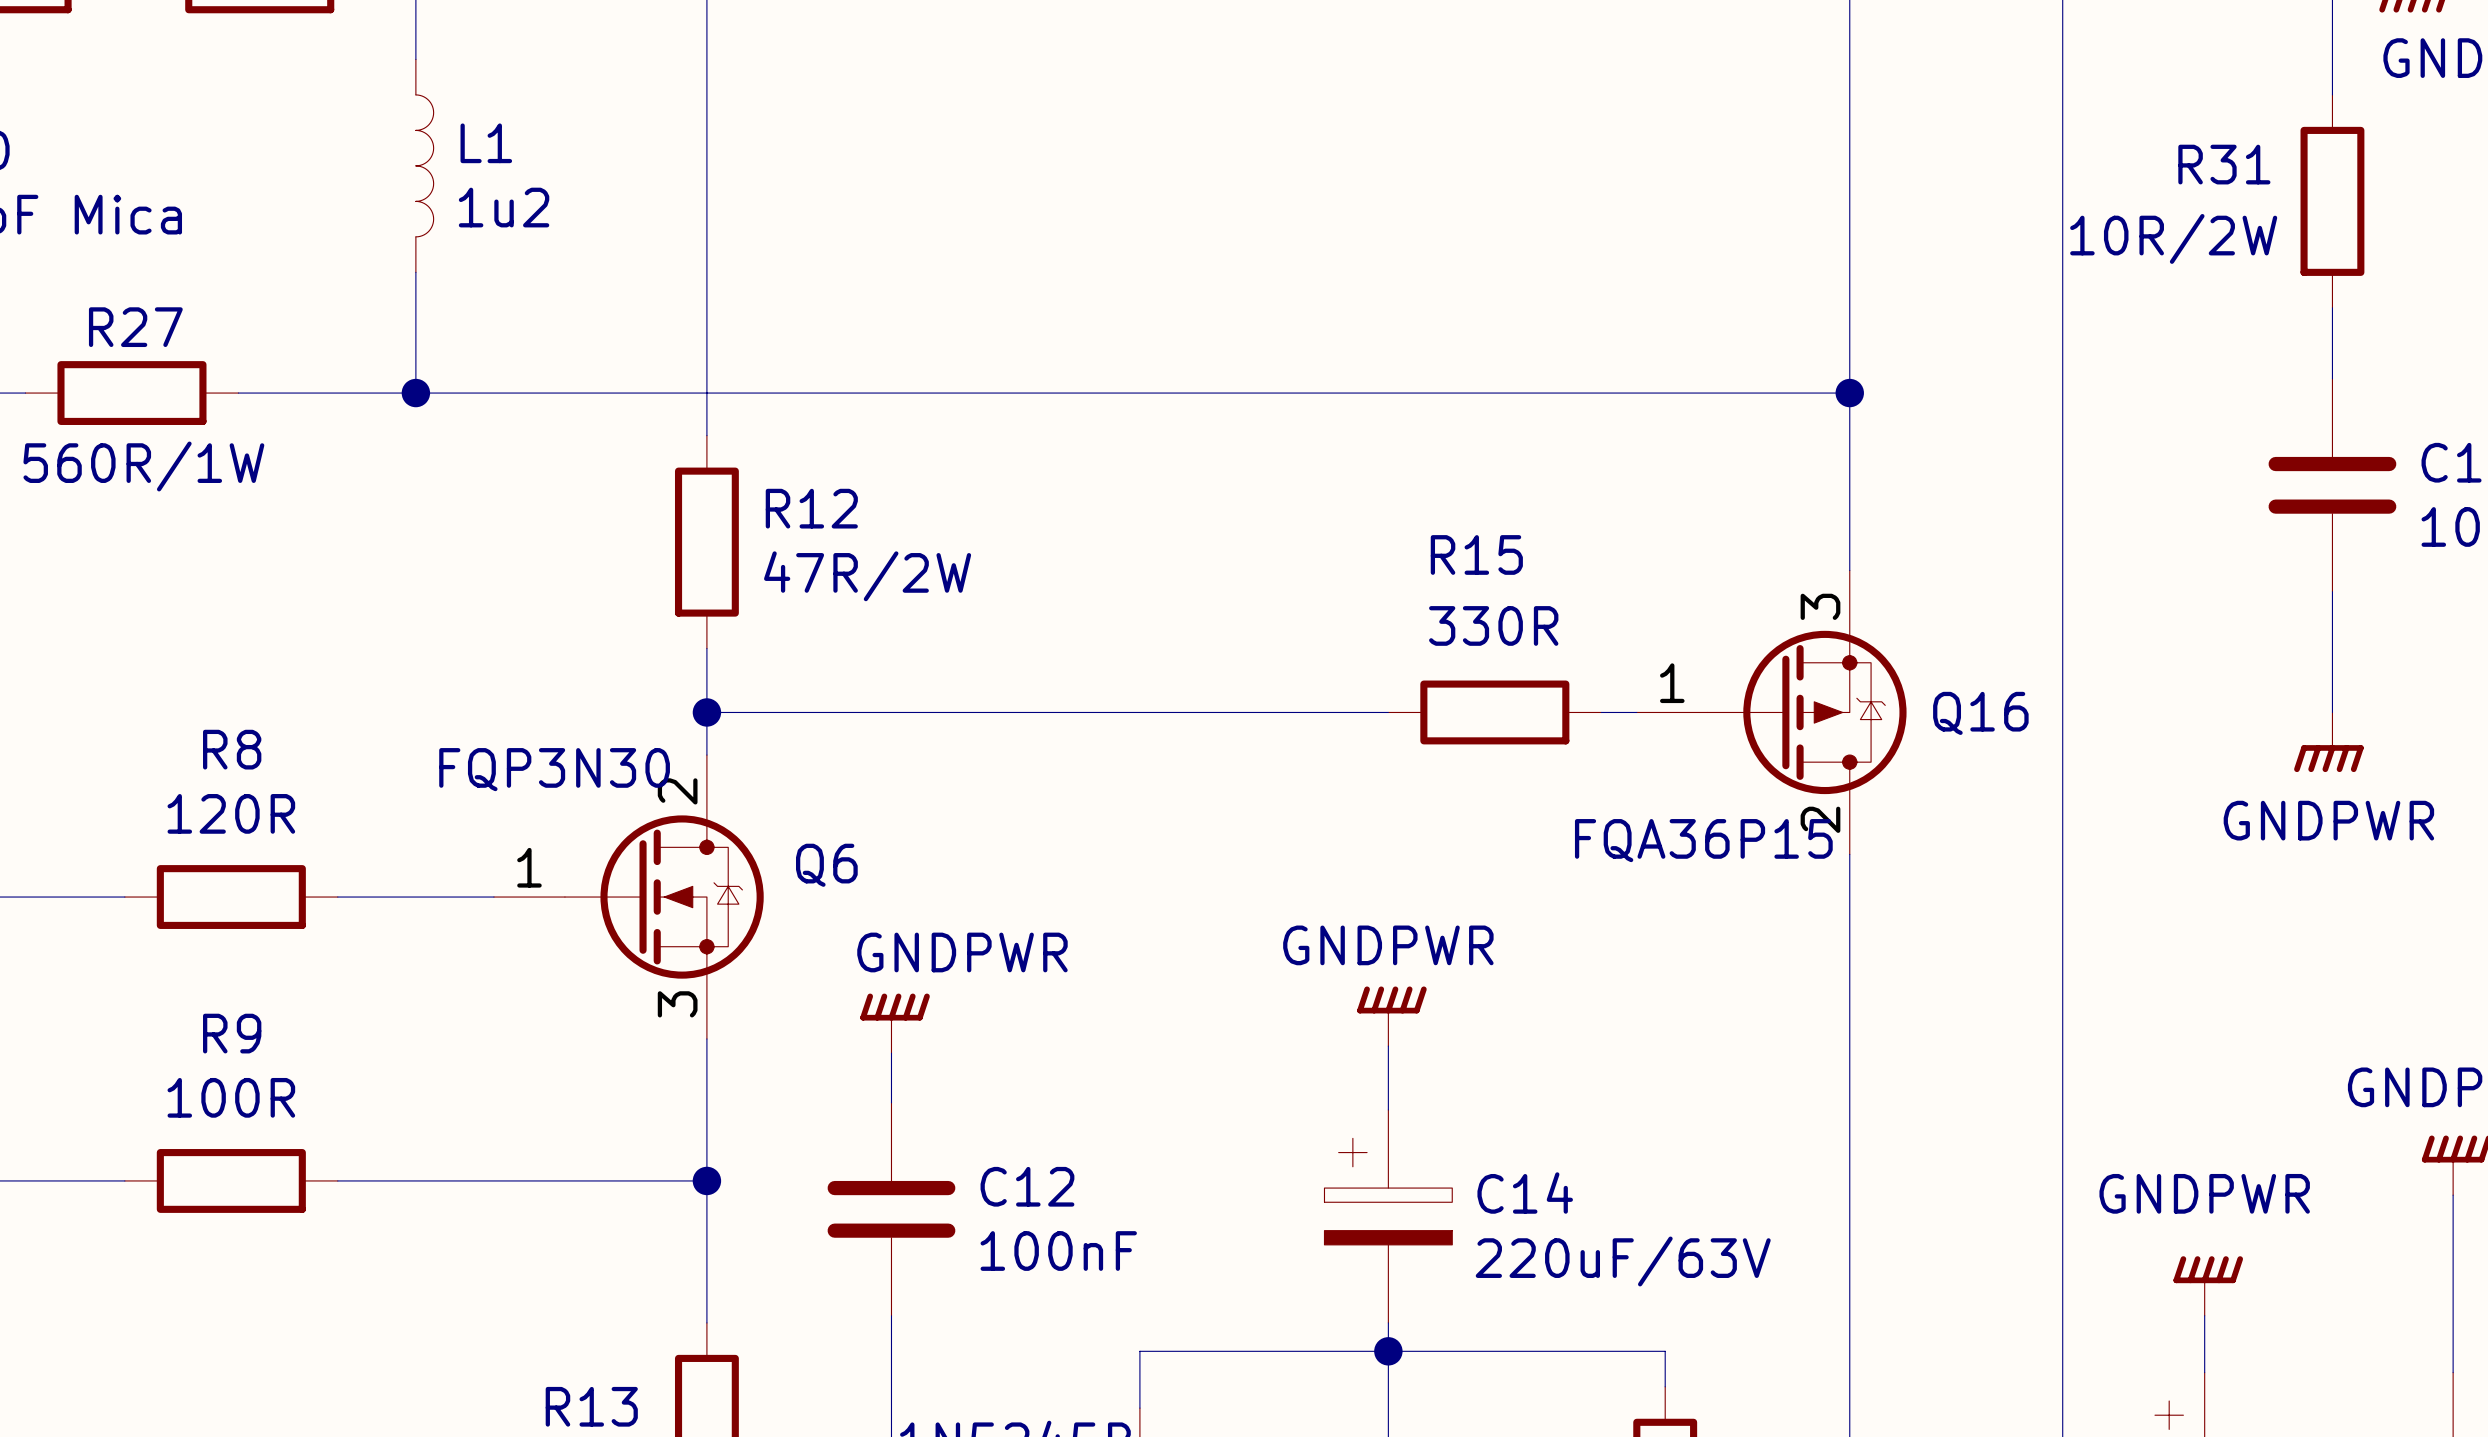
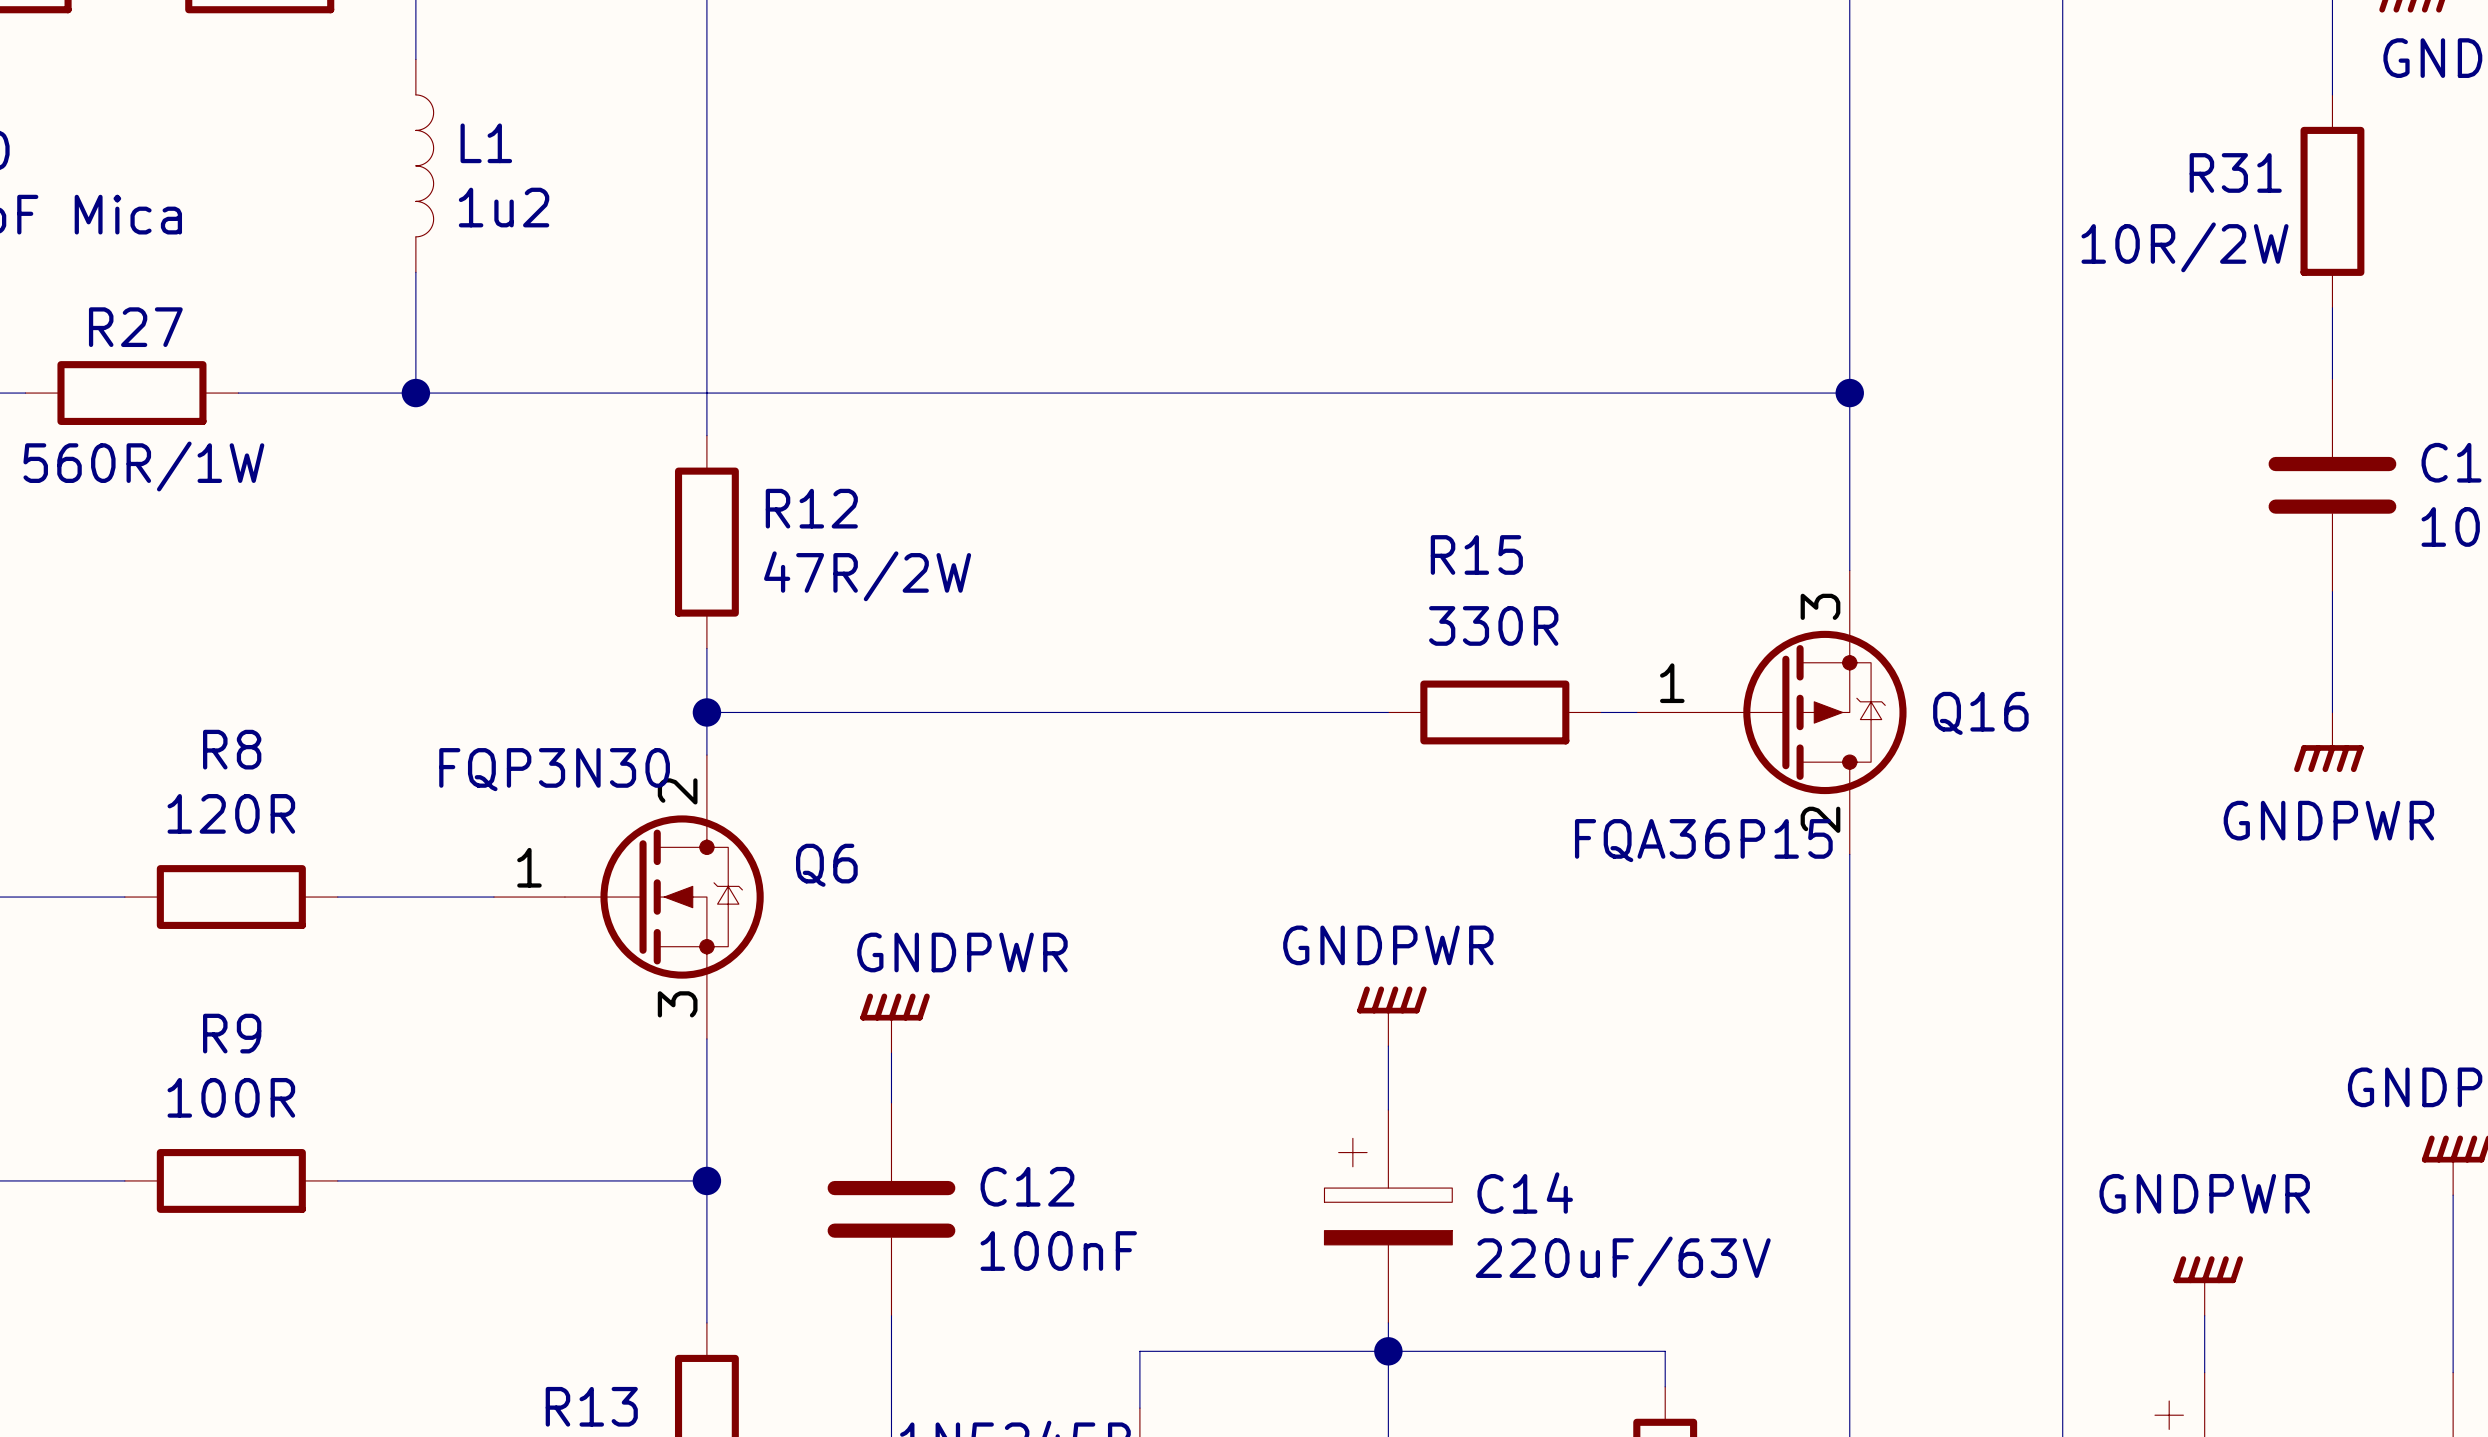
R31 name position: R31 (2224, 164) -> R31 (2235, 172)
R31 value position: 10R/2W (2173, 238) -> 10R/2W (2185, 247)

